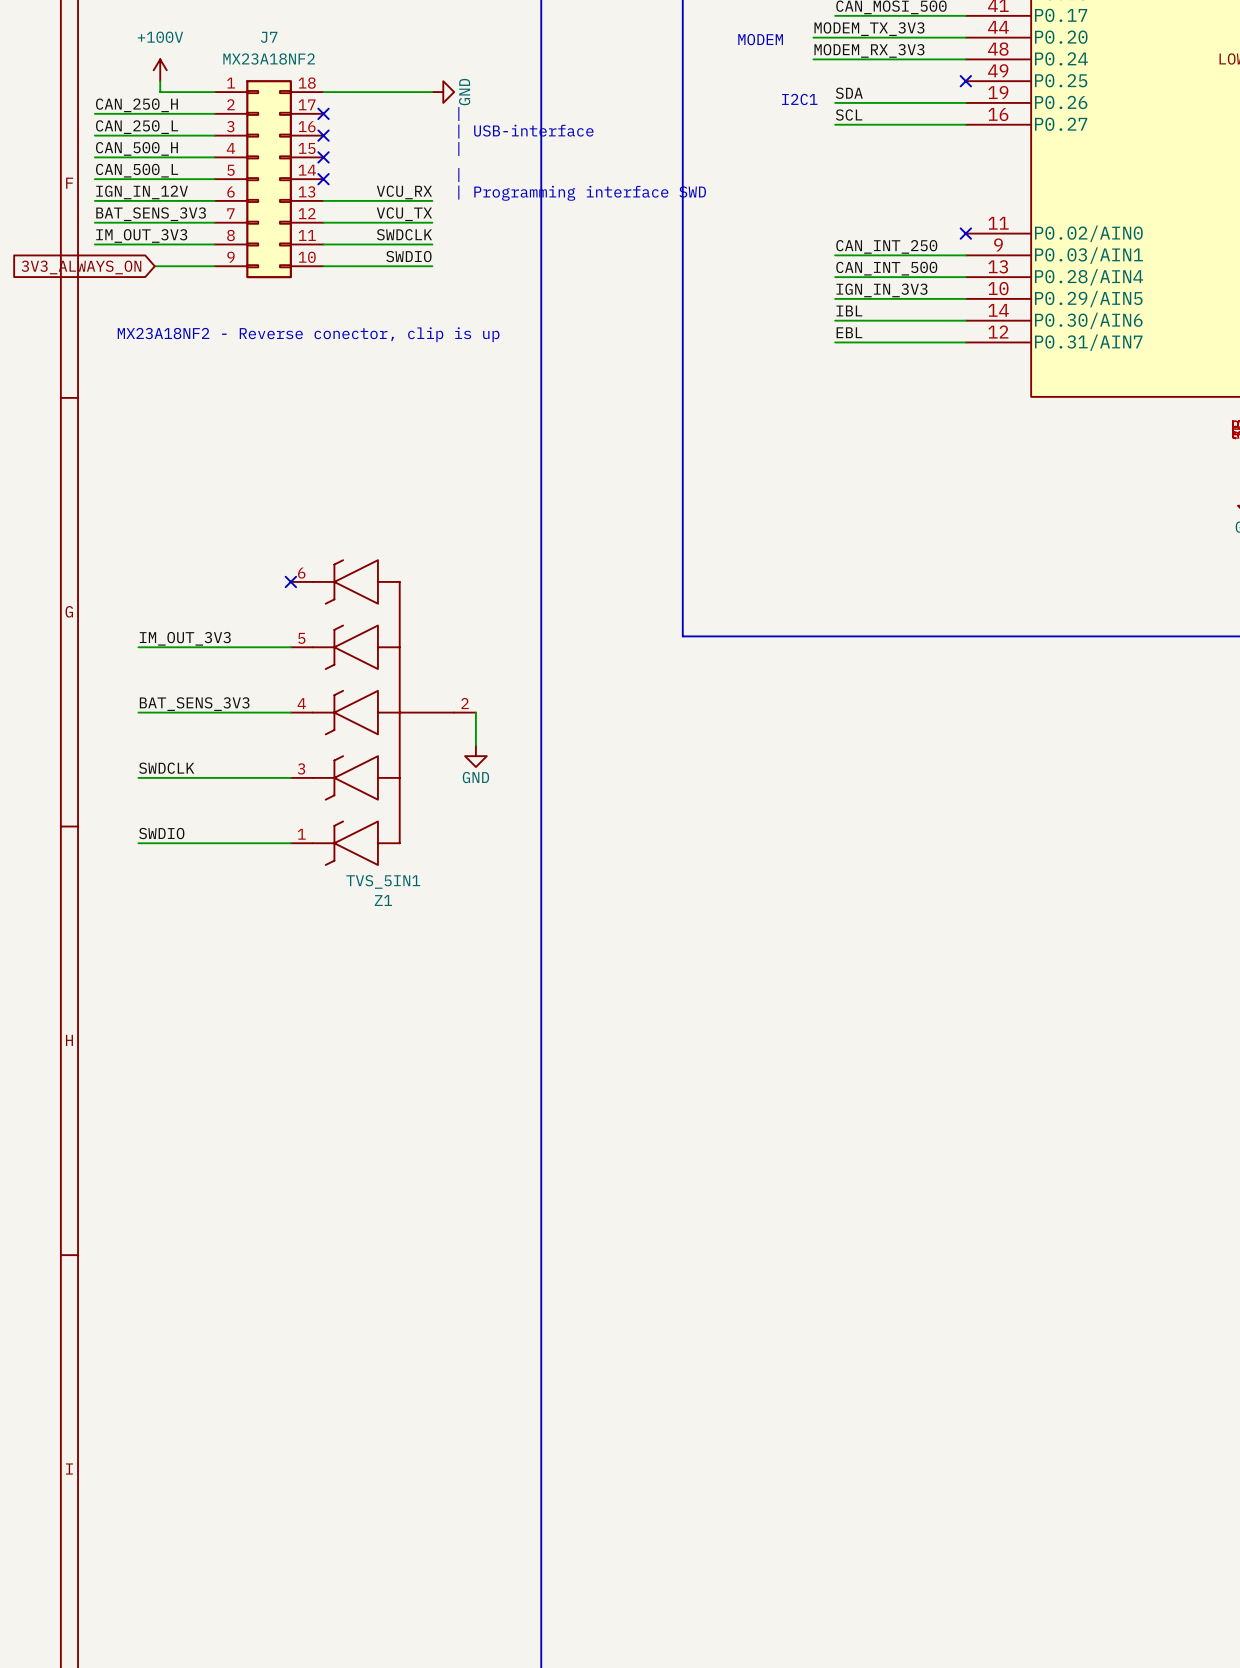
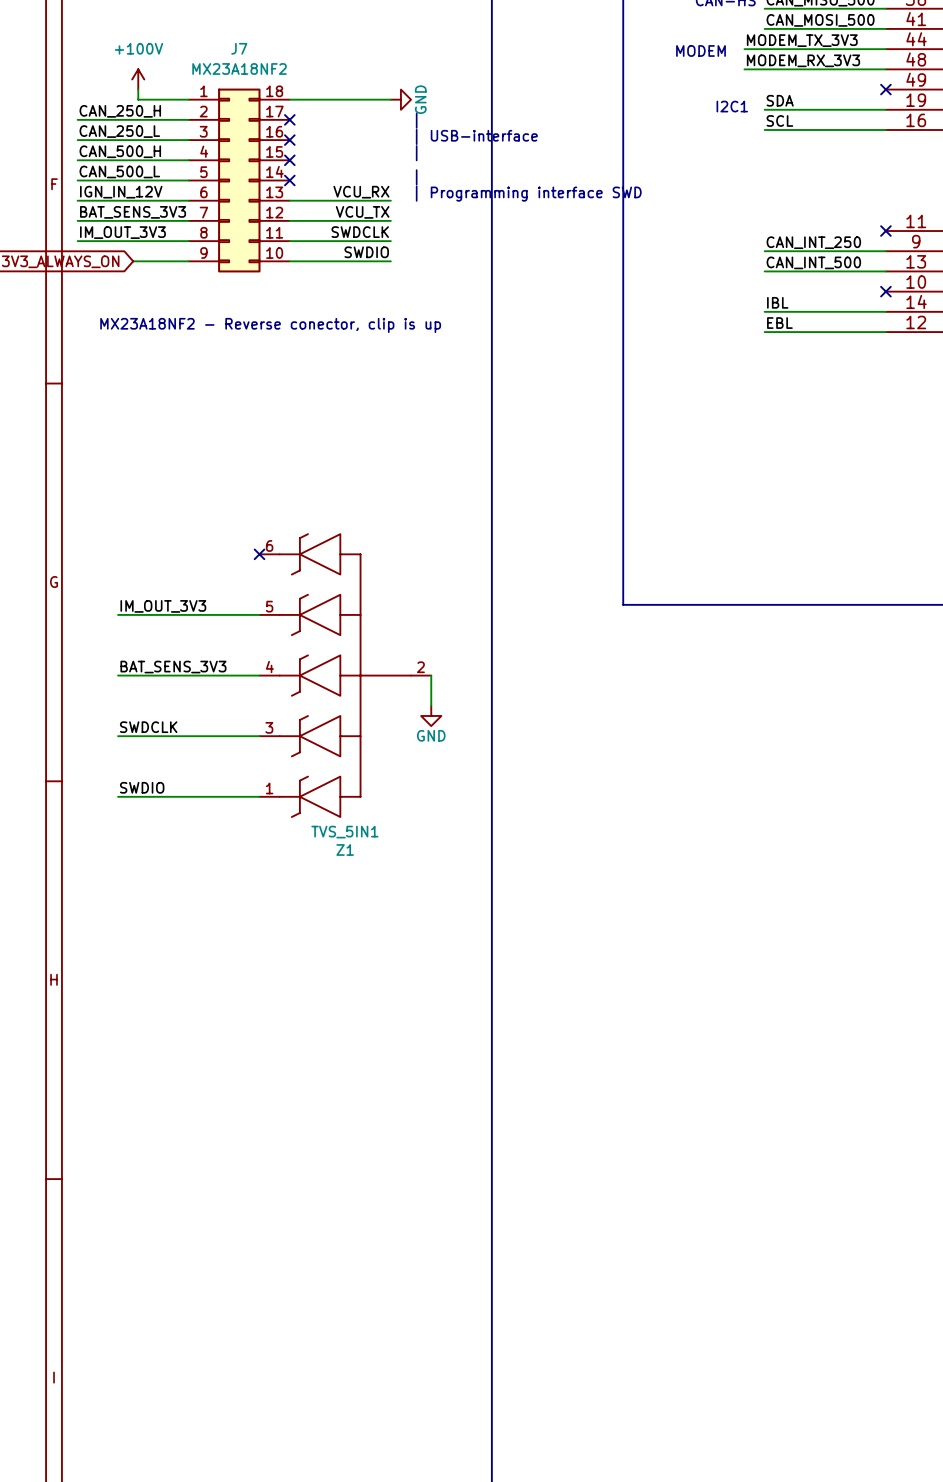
label: IGN_IN_3V3 (882, 290) -> none
wire: (835, 298) (965, 298) -> none
no-connect mark: none -> (885, 291)

